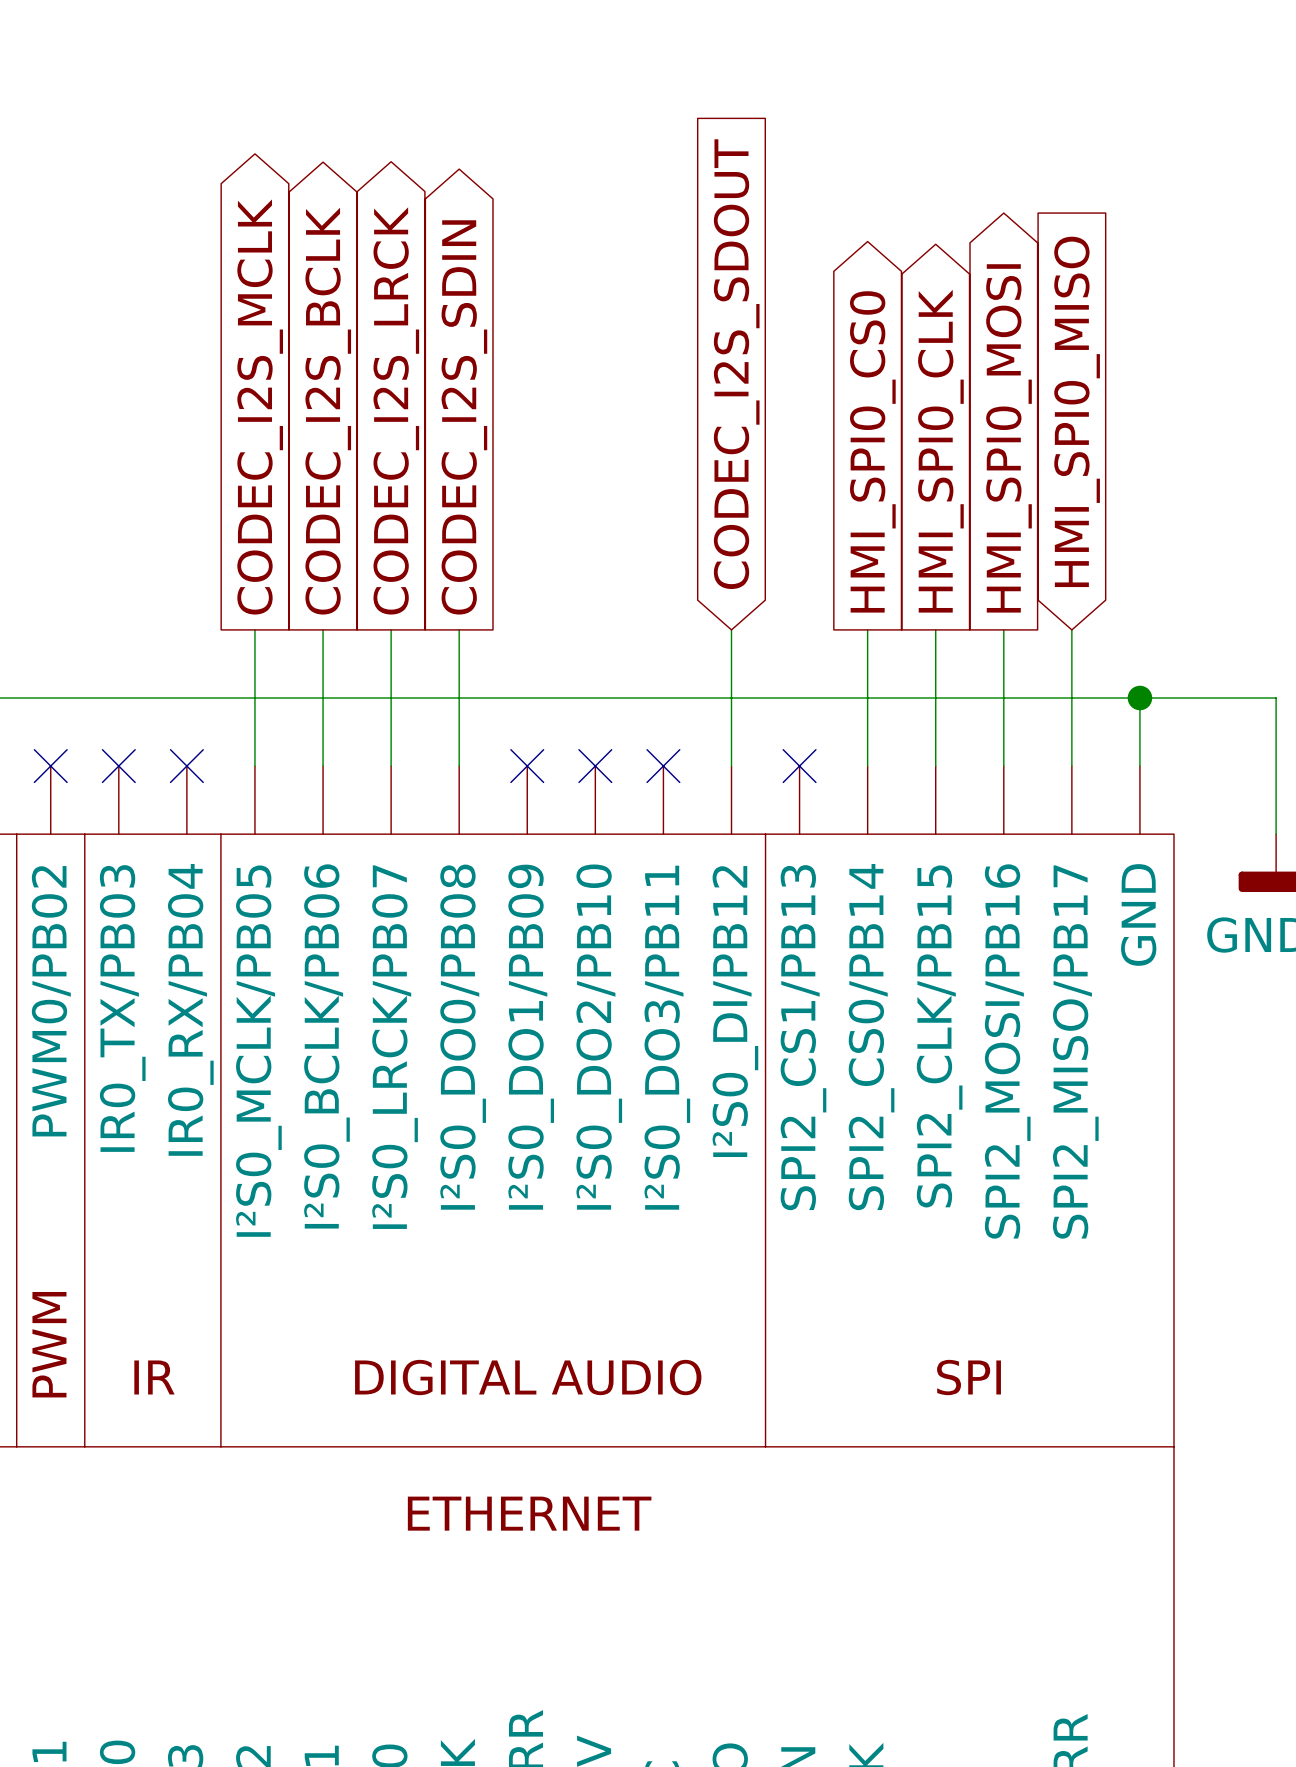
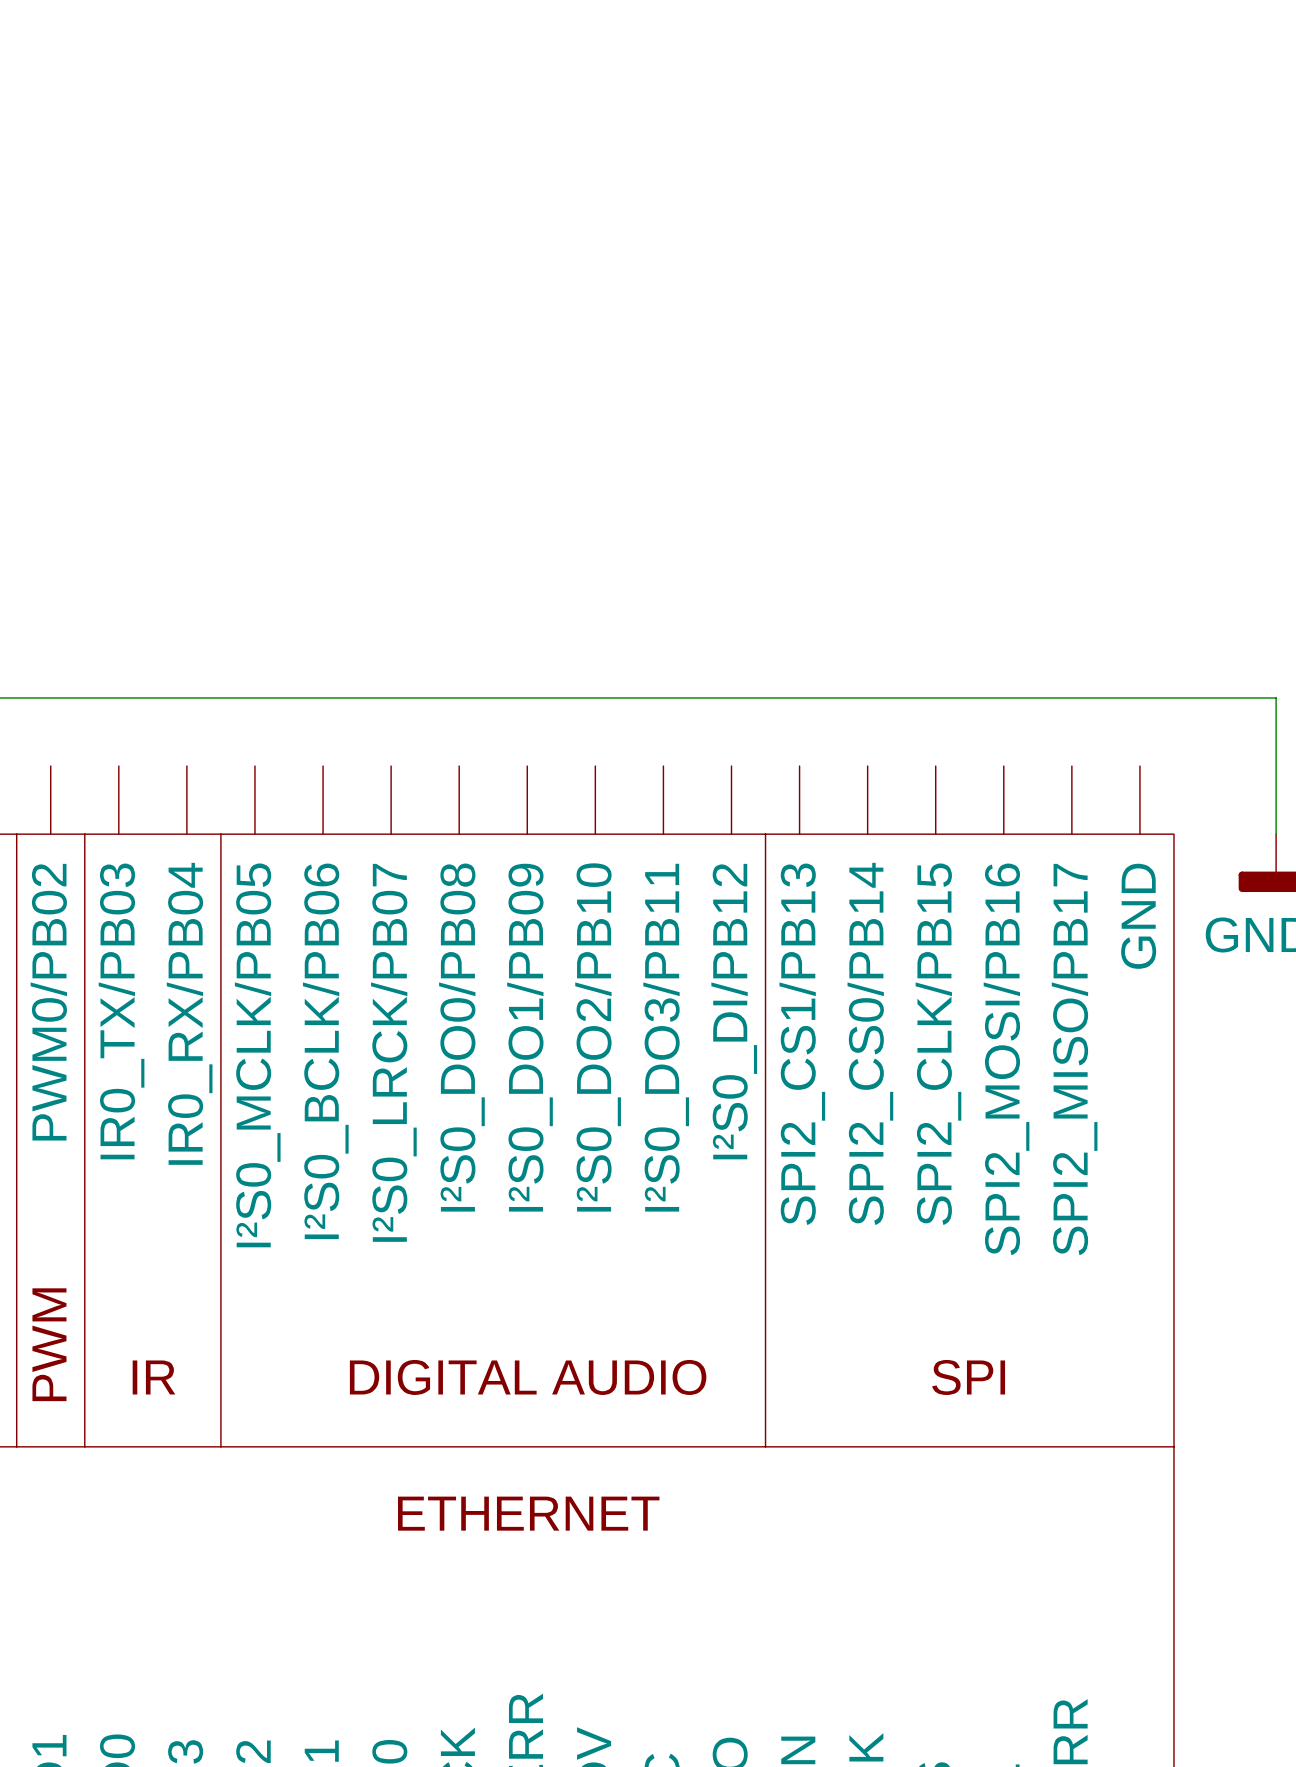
global label: CODEC_I2S_SDOUT (736, 364) -> none
global label: CODEC_I2S_MCLK (260, 407) -> none
global label: CODEC_I2S_LRCK (396, 410) -> none
global label: CODEC_I2S_BCLK (328, 411) -> none
global label: HMI_SPI0_MISO (1077, 411) -> none
global label: CODEC_I2S_SDIN (464, 417) -> none
global label: HMI_SPI0_MOSI (1008, 438) -> none
global label: HMI_SPI0_CS0 (872, 451) -> none
global label: HMI_SPI0_CLK (940, 451) -> none
wire: (254, 629) (254, 766) -> none
wire: (323, 629) (323, 766) -> none
wire: (391, 629) (391, 766) -> none
wire: (459, 629) (459, 766) -> none
wire: (731, 629) (731, 766) -> none
wire: (867, 629) (867, 766) -> none
wire: (935, 629) (935, 766) -> none
wire: (1003, 629) (1003, 766) -> none
wire: (1071, 629) (1071, 766) -> none
wire: (1139, 698) (1139, 766) -> none
junction: (1139, 698) -> none
no-connect mark: (50, 766) -> none
no-connect mark: (118, 766) -> none
no-connect mark: (186, 766) -> none
no-connect mark: (527, 766) -> none
no-connect mark: (595, 766) -> none
no-connect mark: (663, 766) -> none
no-connect mark: (799, 766) -> none

